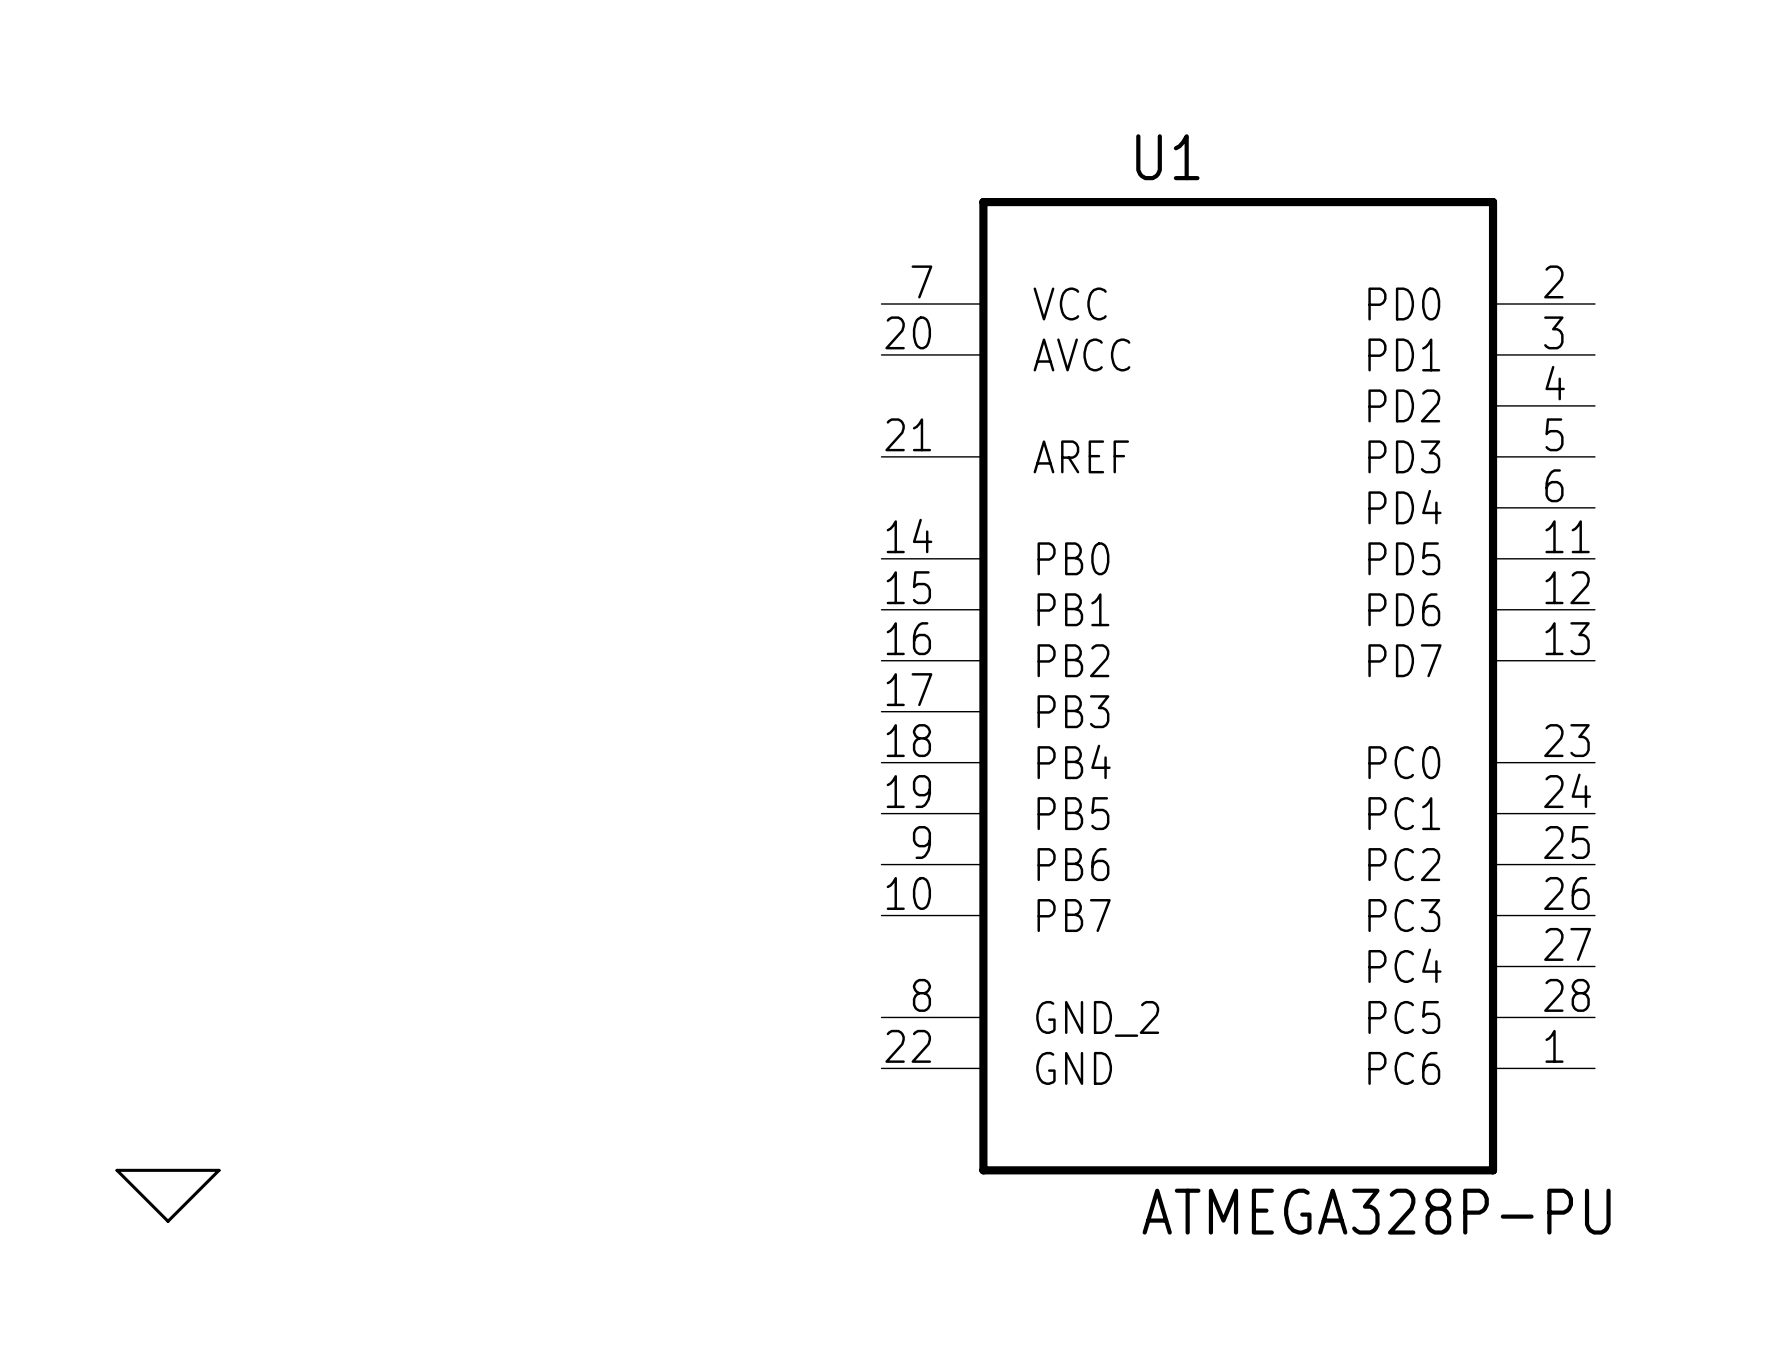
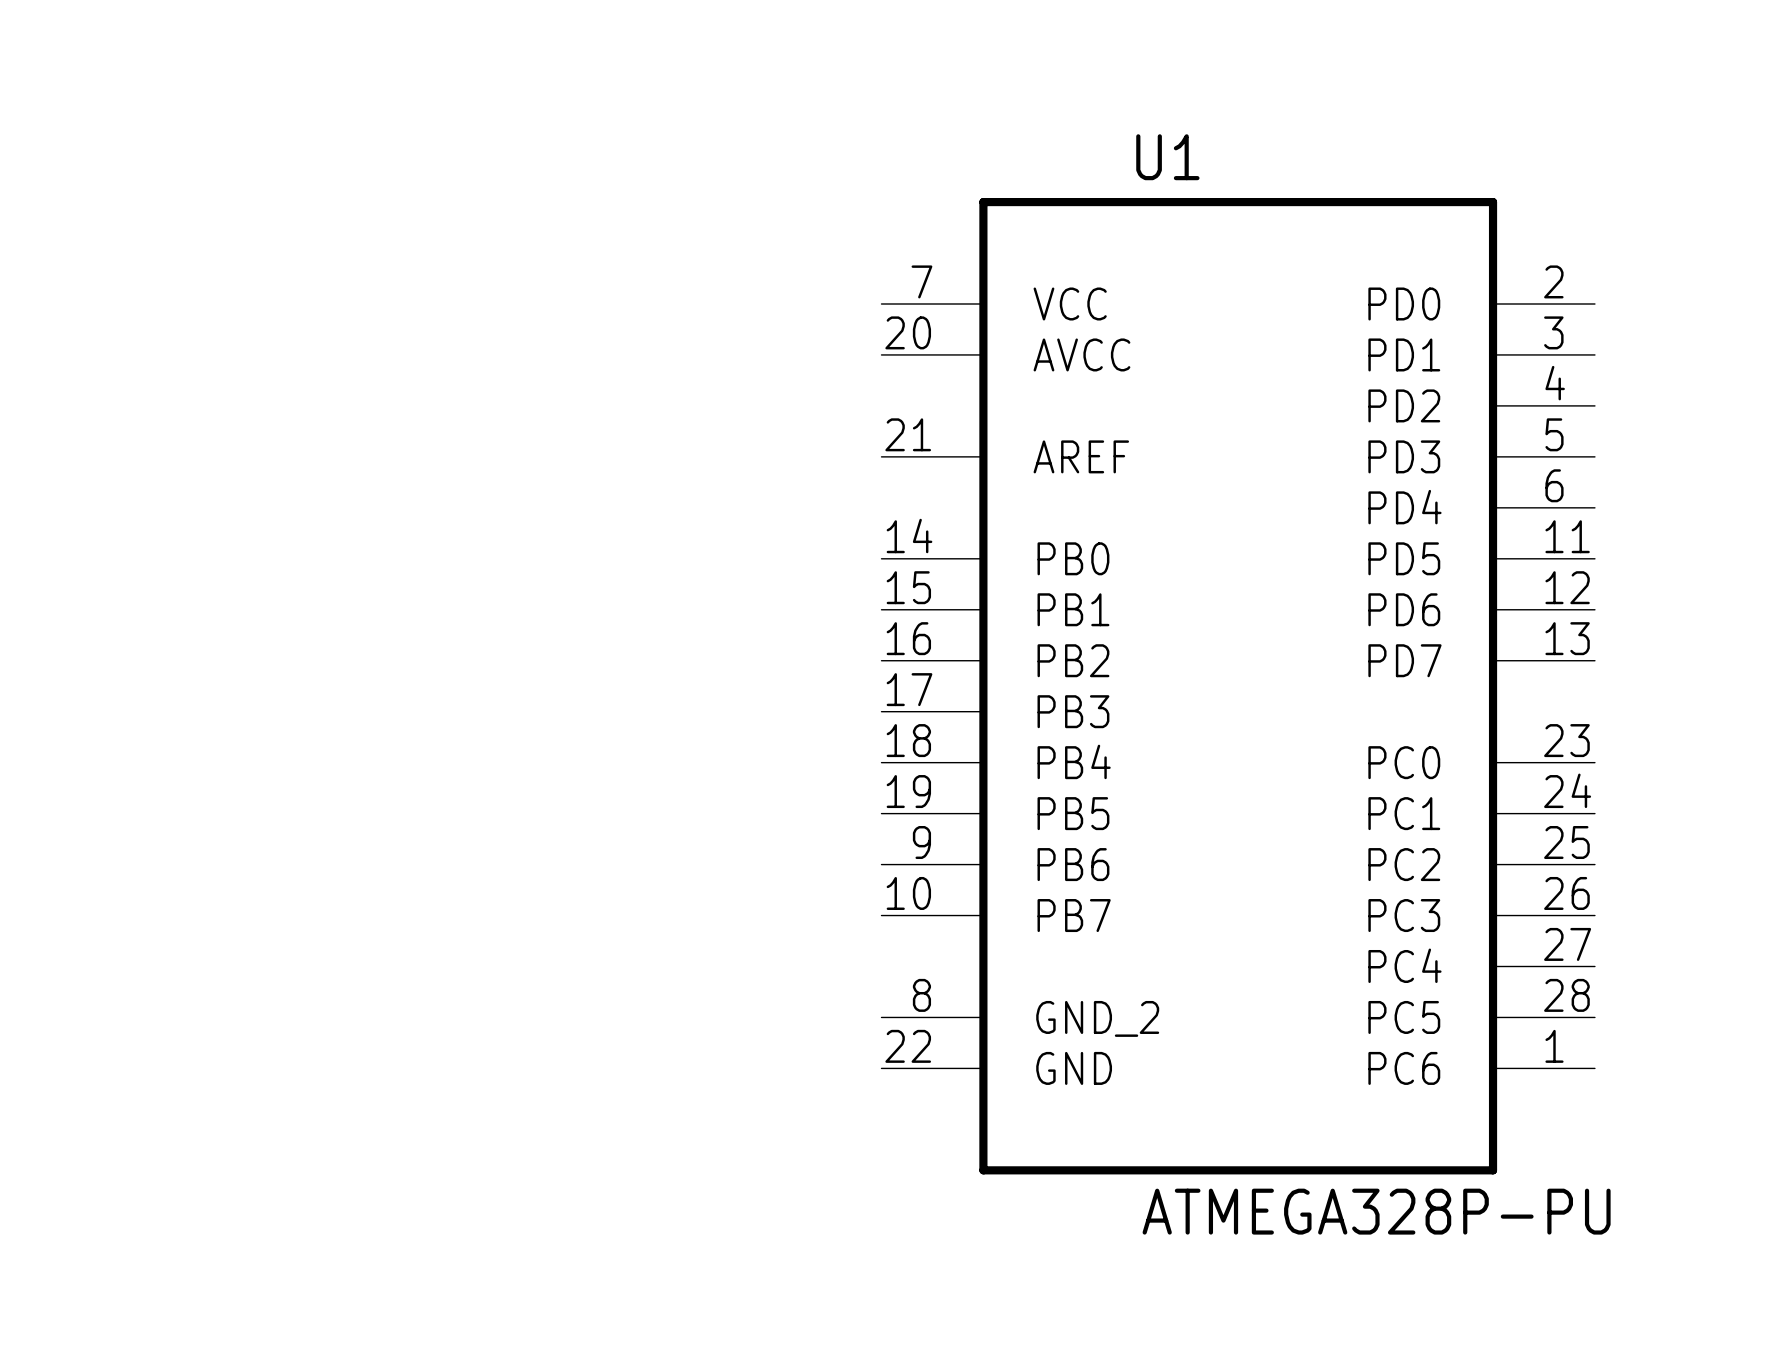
power symbol: (168, 1195) -> none

